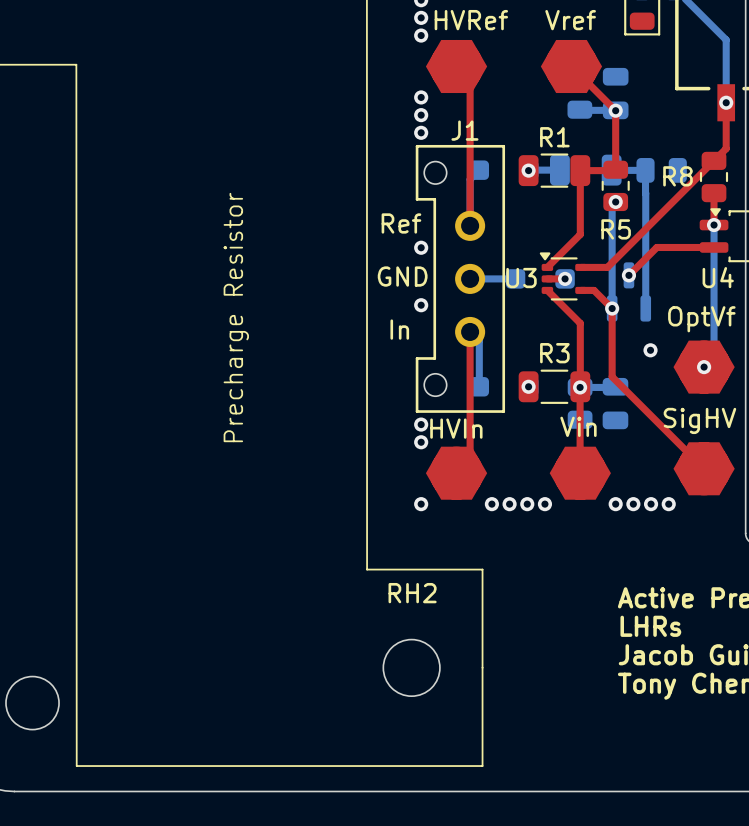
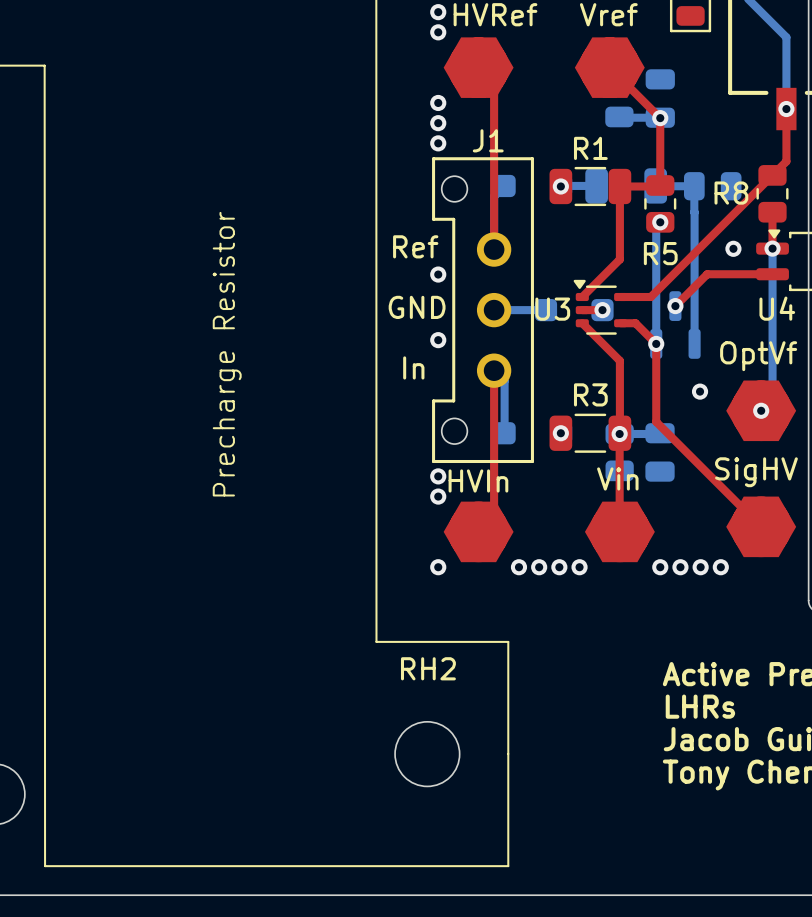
via: none -> (733, 248)

